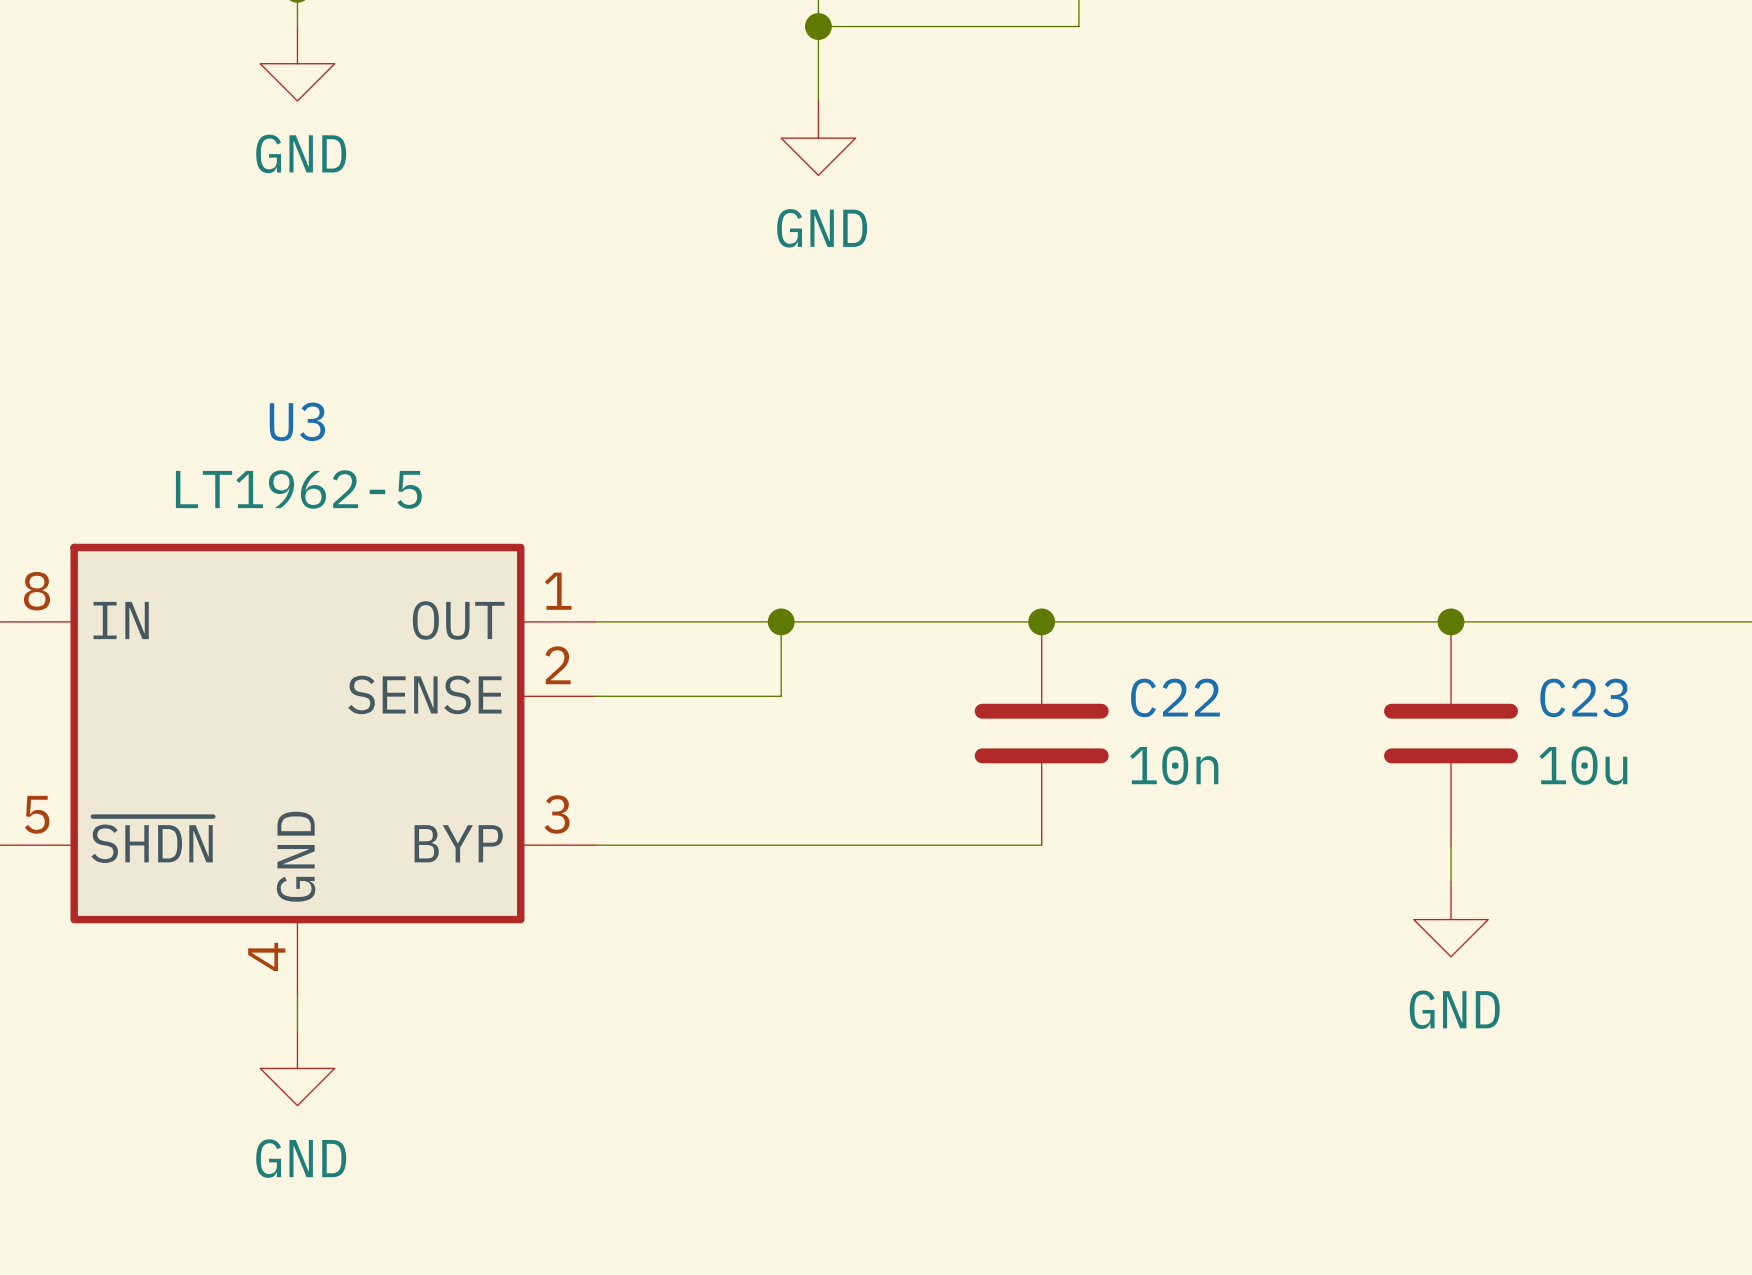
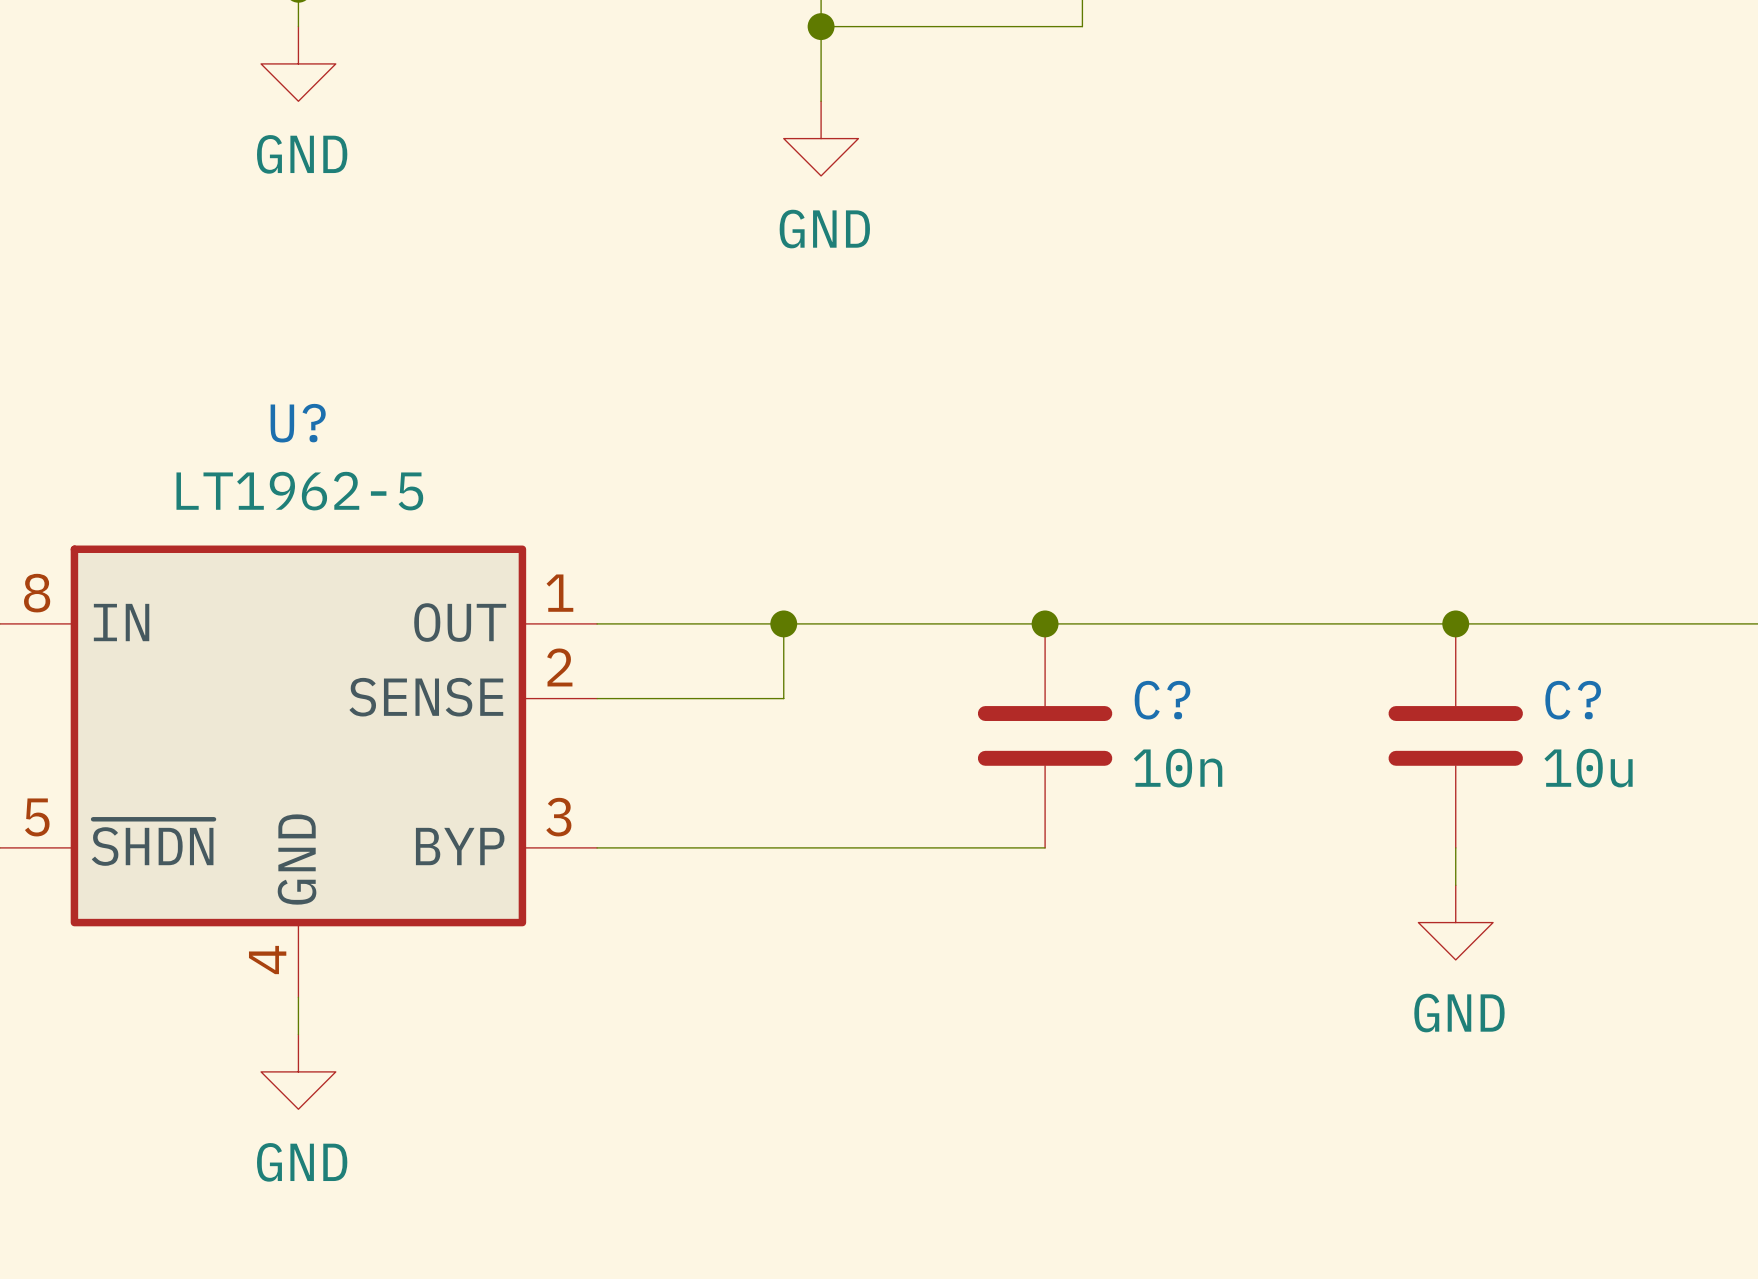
U3 name: U3 (297, 421) -> U? (298, 423)
C22 name: C22 (1175, 697) -> C? (1162, 700)
C23 name: C23 (1584, 697) -> C? (1573, 700)

